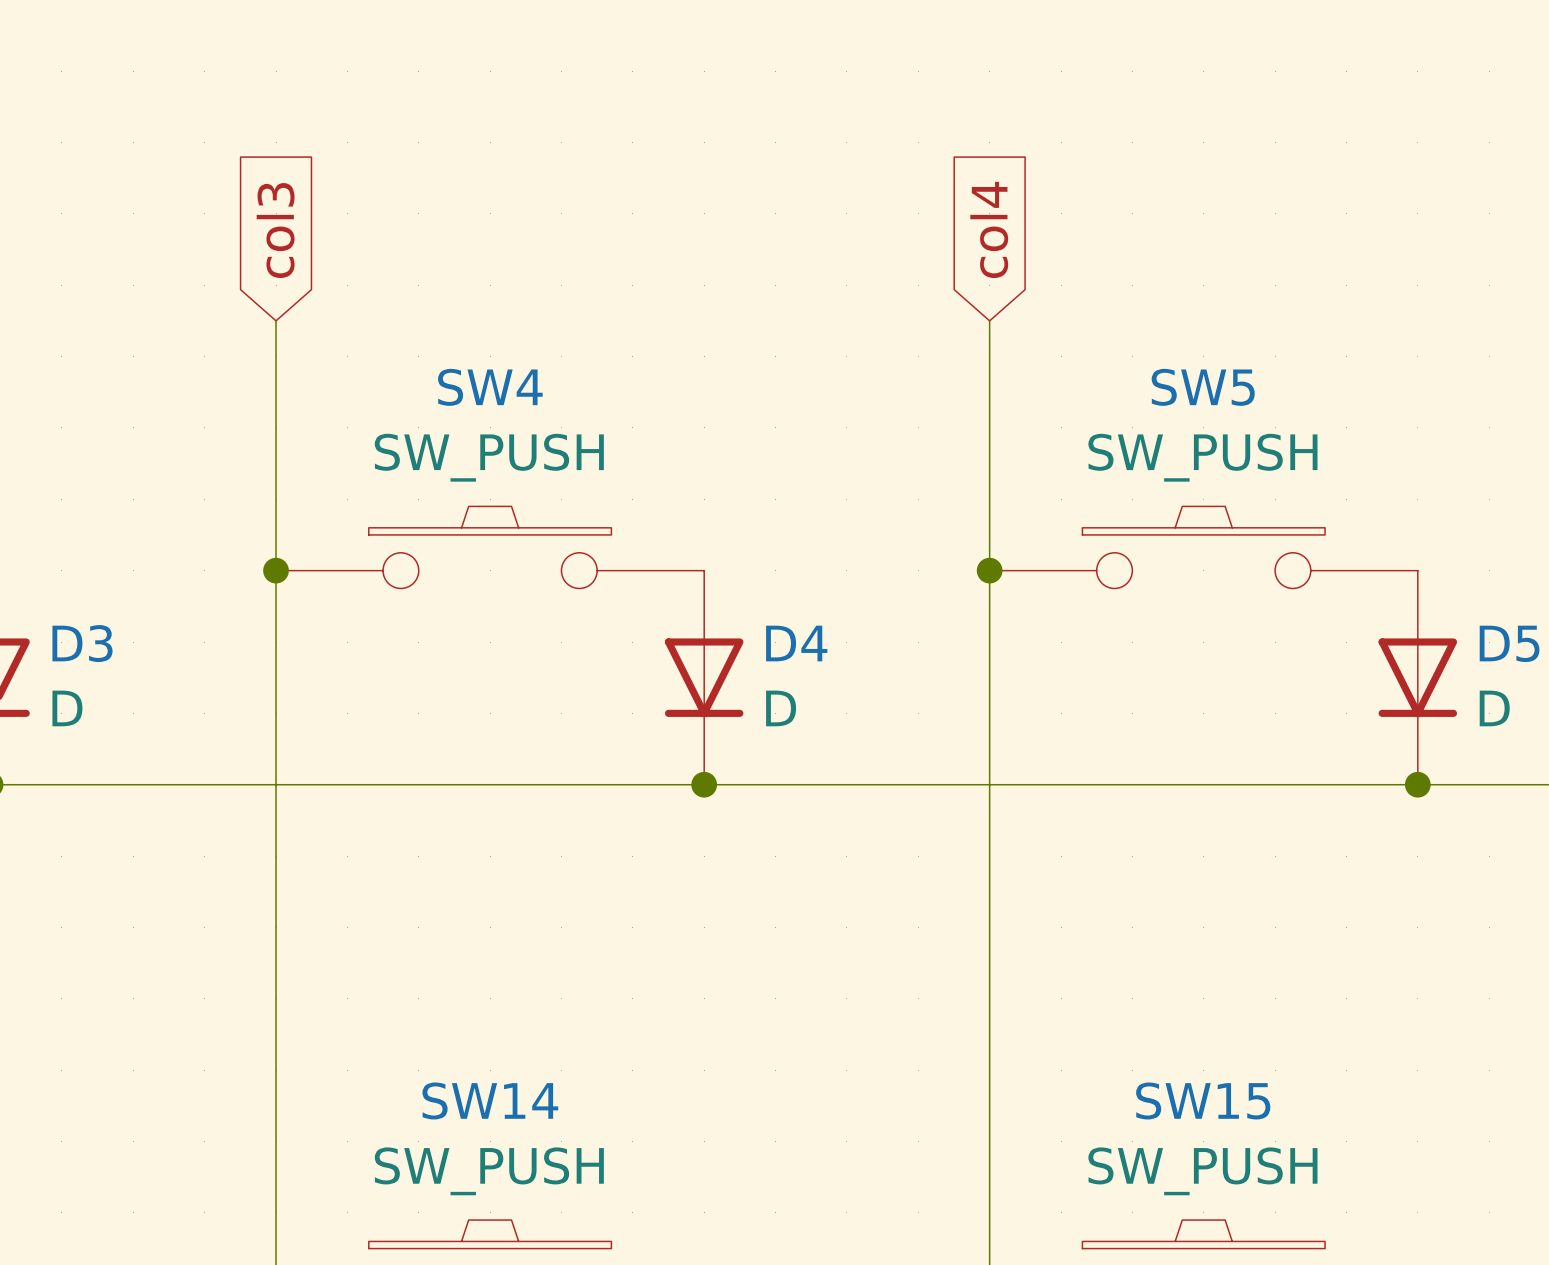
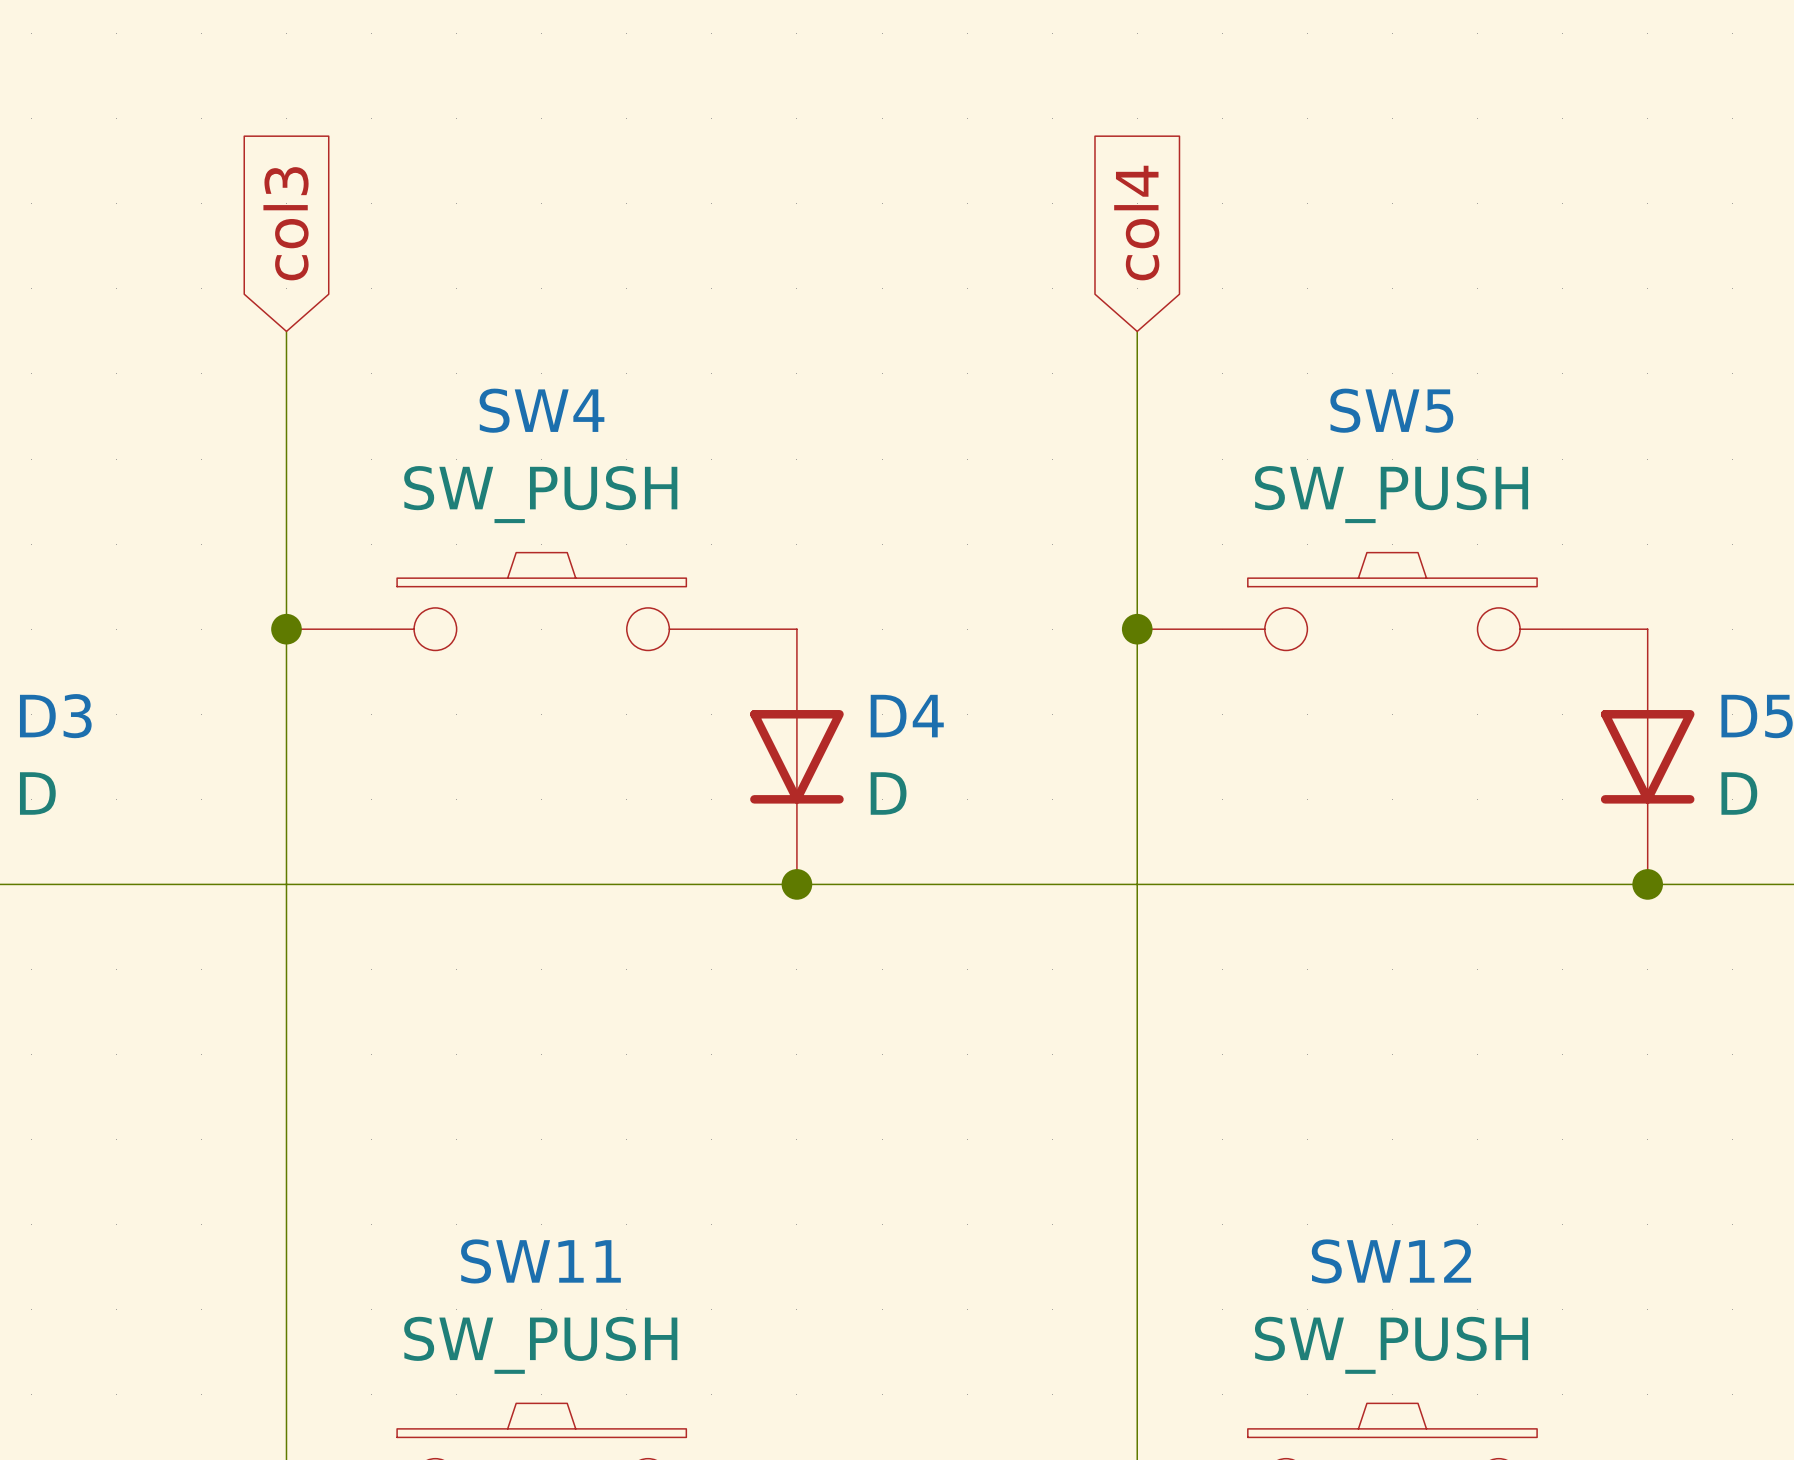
SW14 name: SW14 (490, 1100) -> SW11 (540, 1261)
SW15 name: SW15 (1203, 1100) -> SW12 (1391, 1261)

